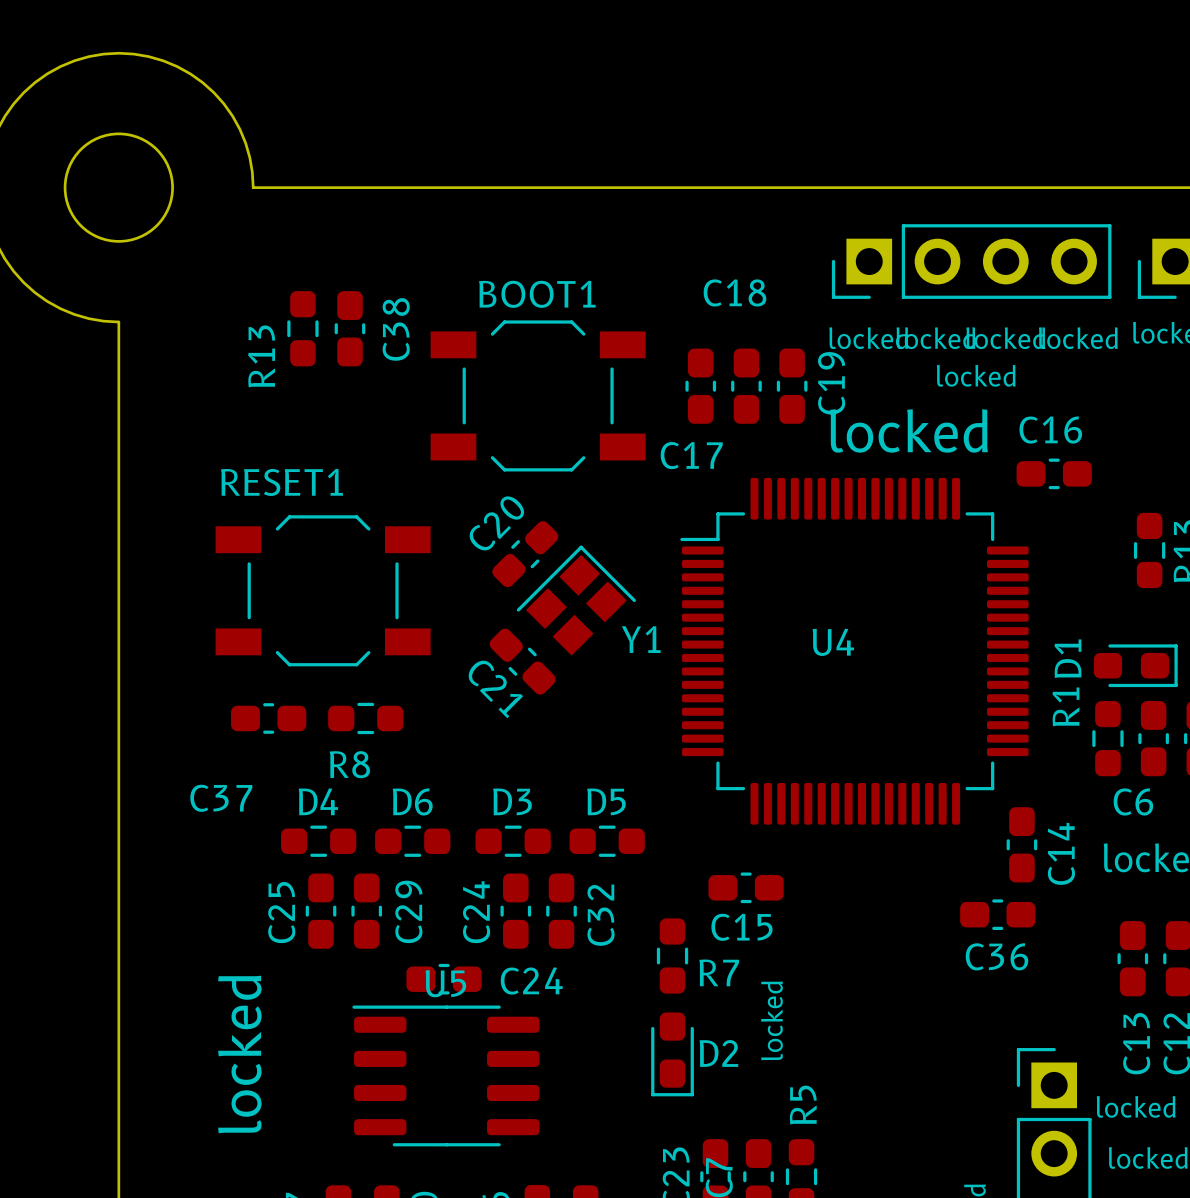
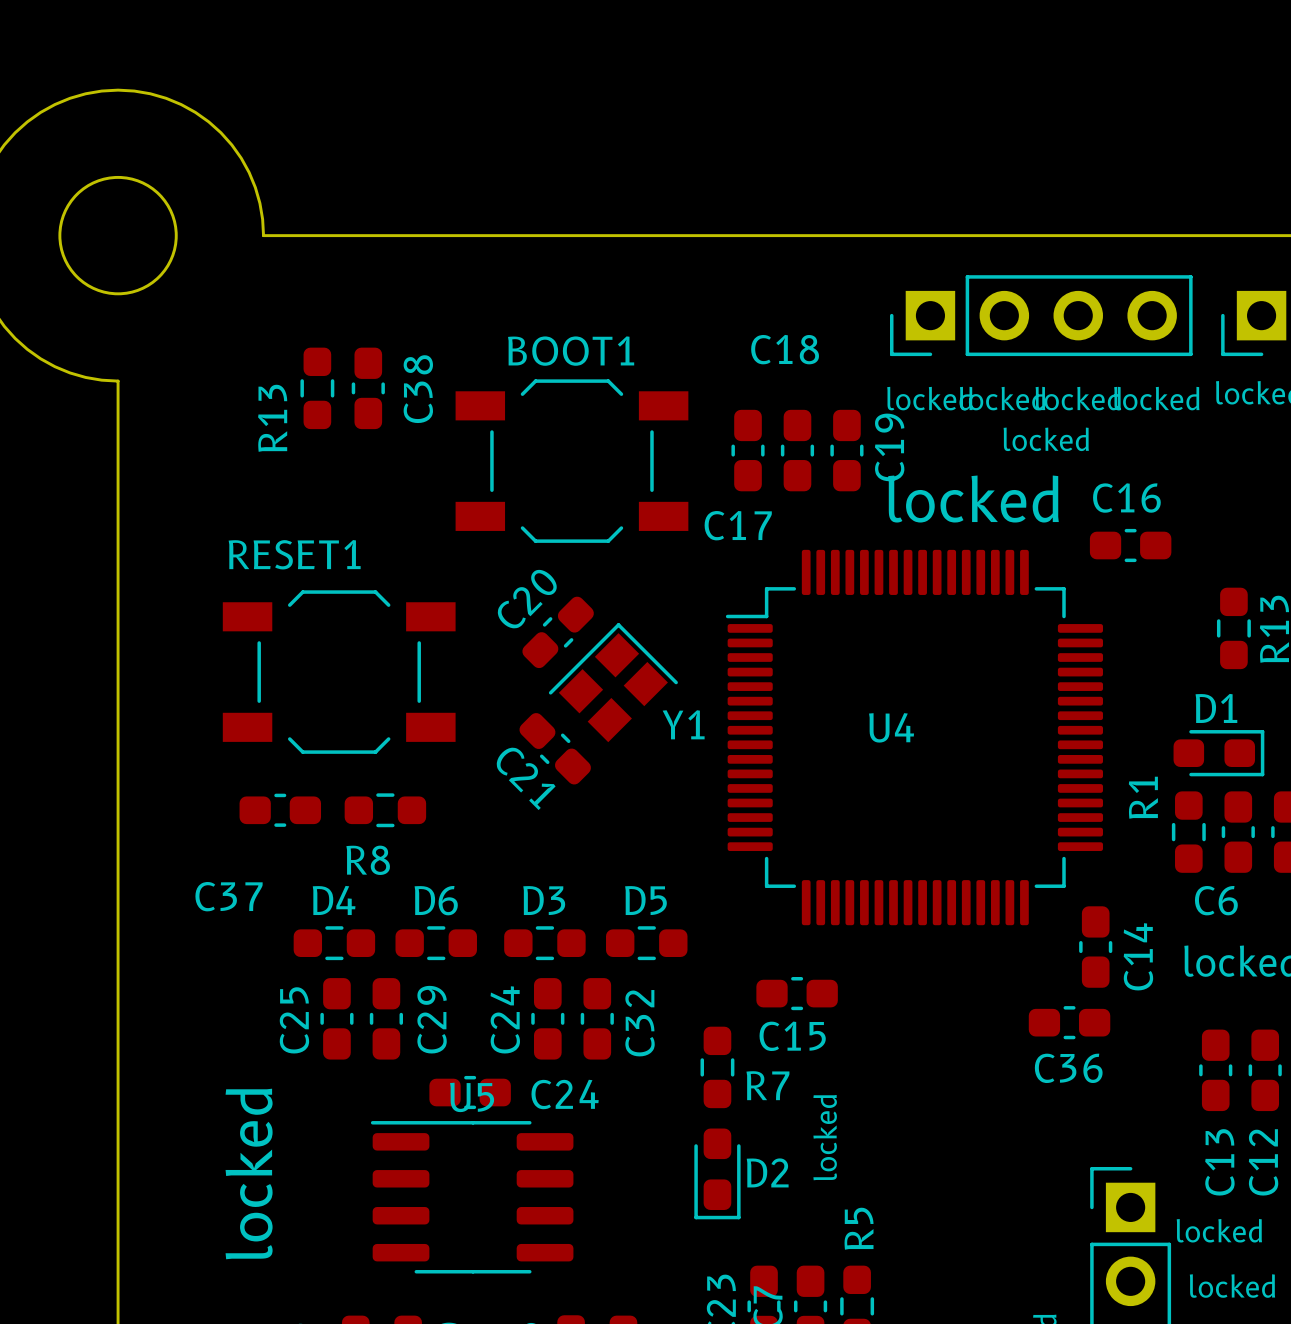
D1 name rotation: 0° (1067, 658) -> 90° clockwise (1216, 708)
D1 name position: D1 (1067, 658) -> D1 (1216, 708)

